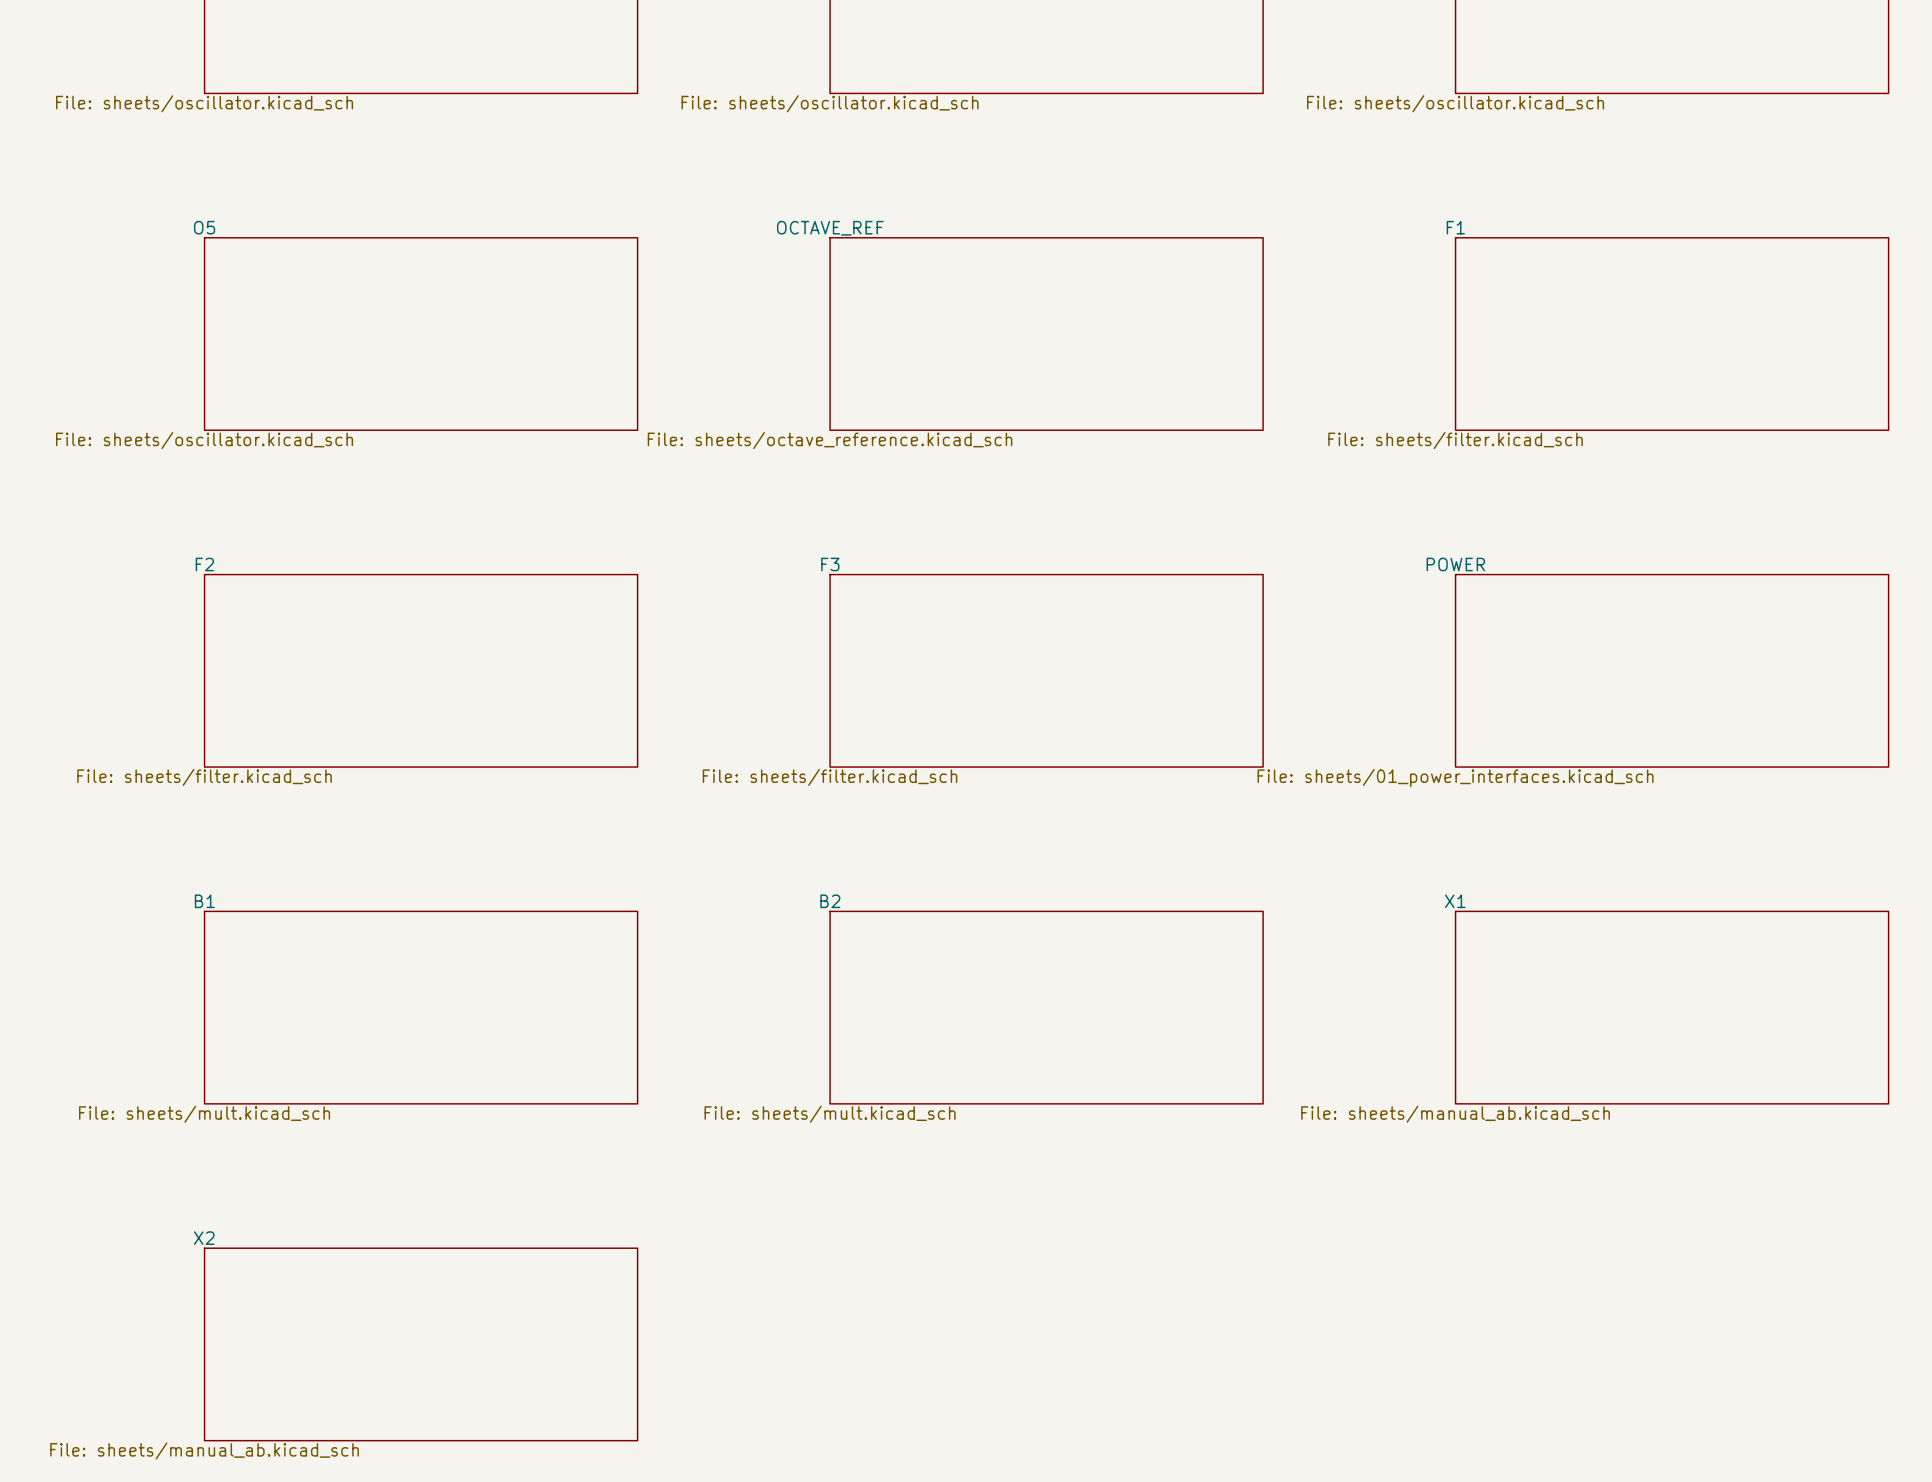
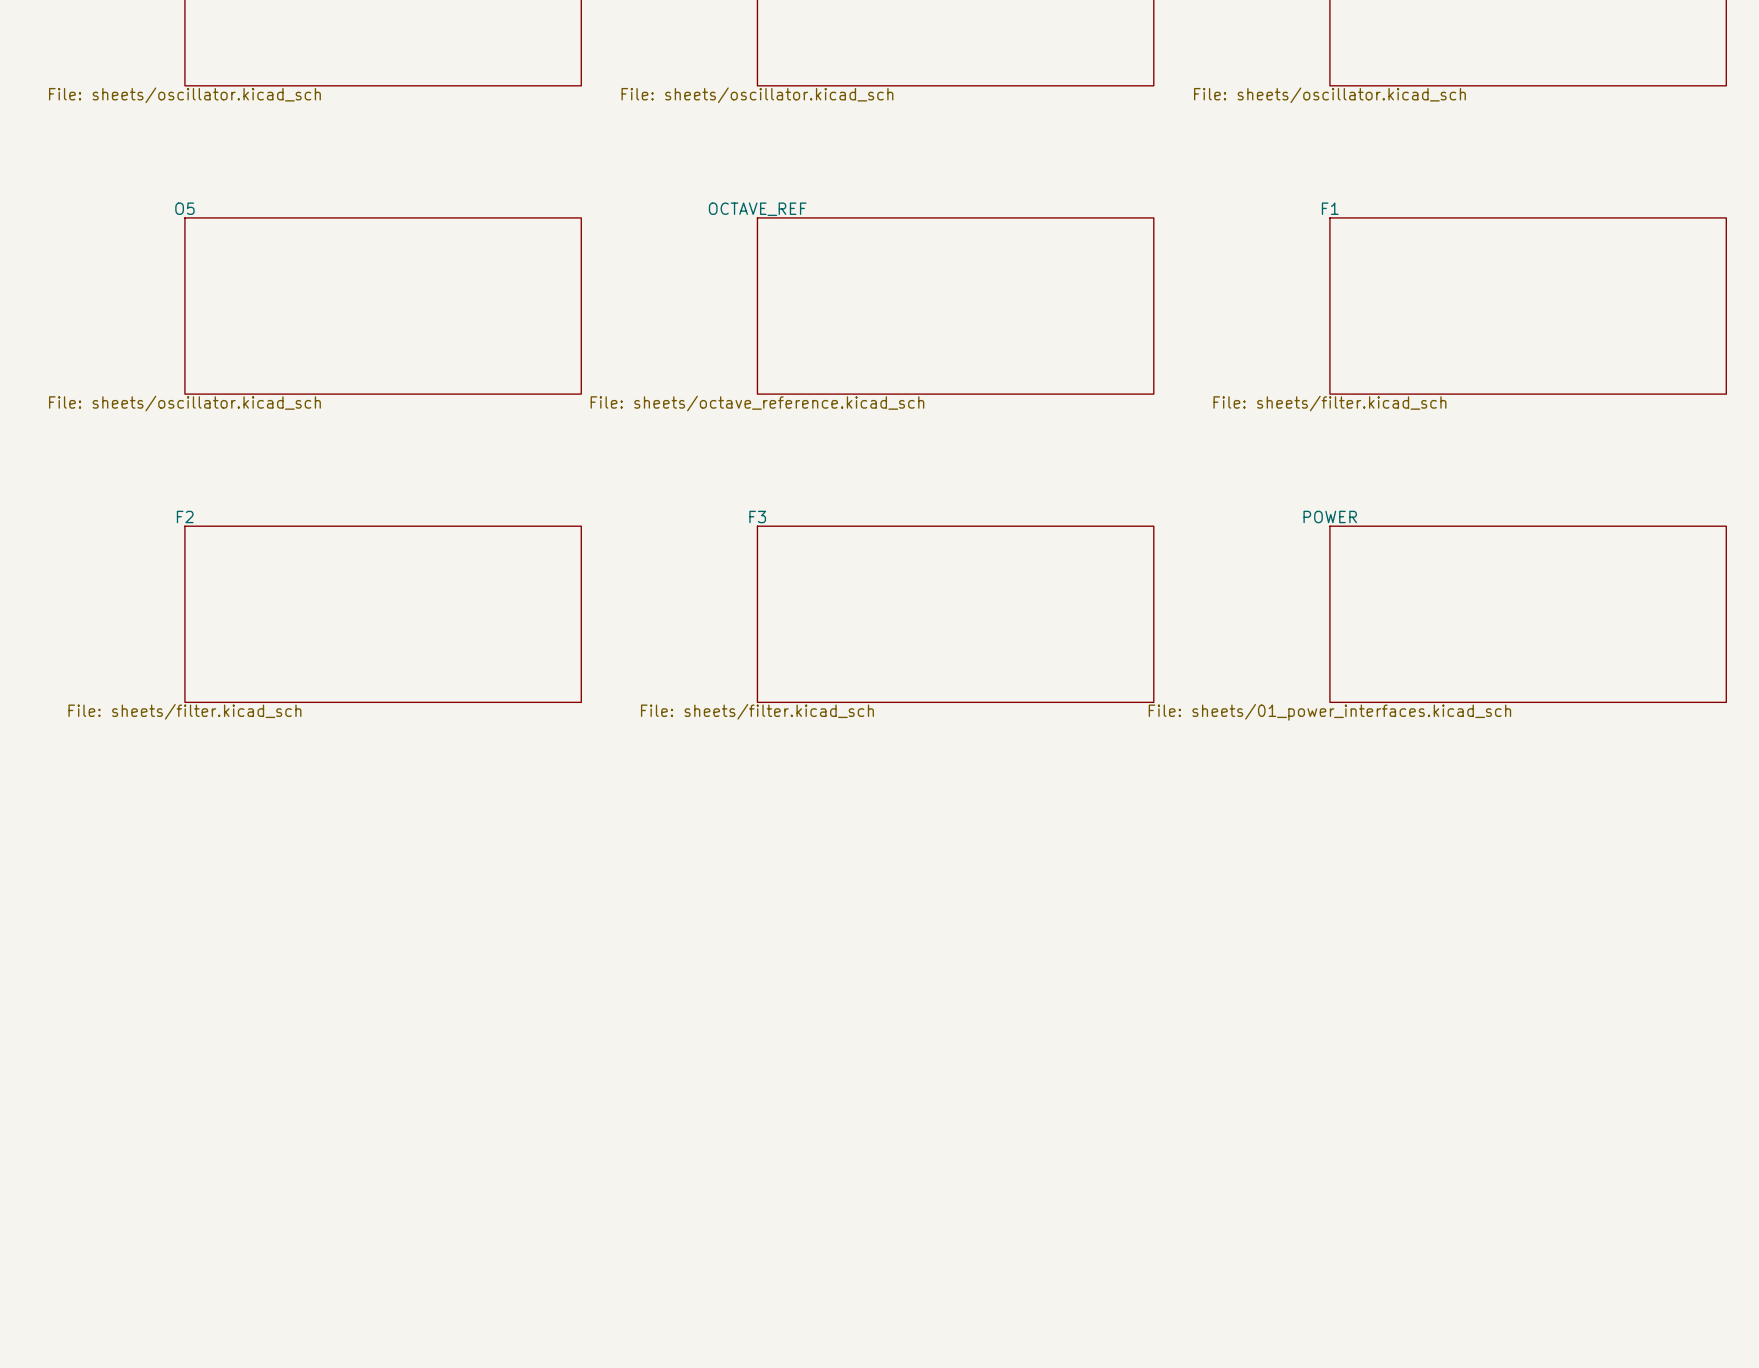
sheet B1: File: sheets/mult.kicad_sch (421, 1007) -> none
sheet B2: File: sheets/mult.kicad_sch (1046, 1007) -> none
sheet X1: File: sheets/manual_ab.kicad_sch (1672, 1007) -> none
sheet X2: File: sheets/manual_ab.kicad_sch (421, 1344) -> none

